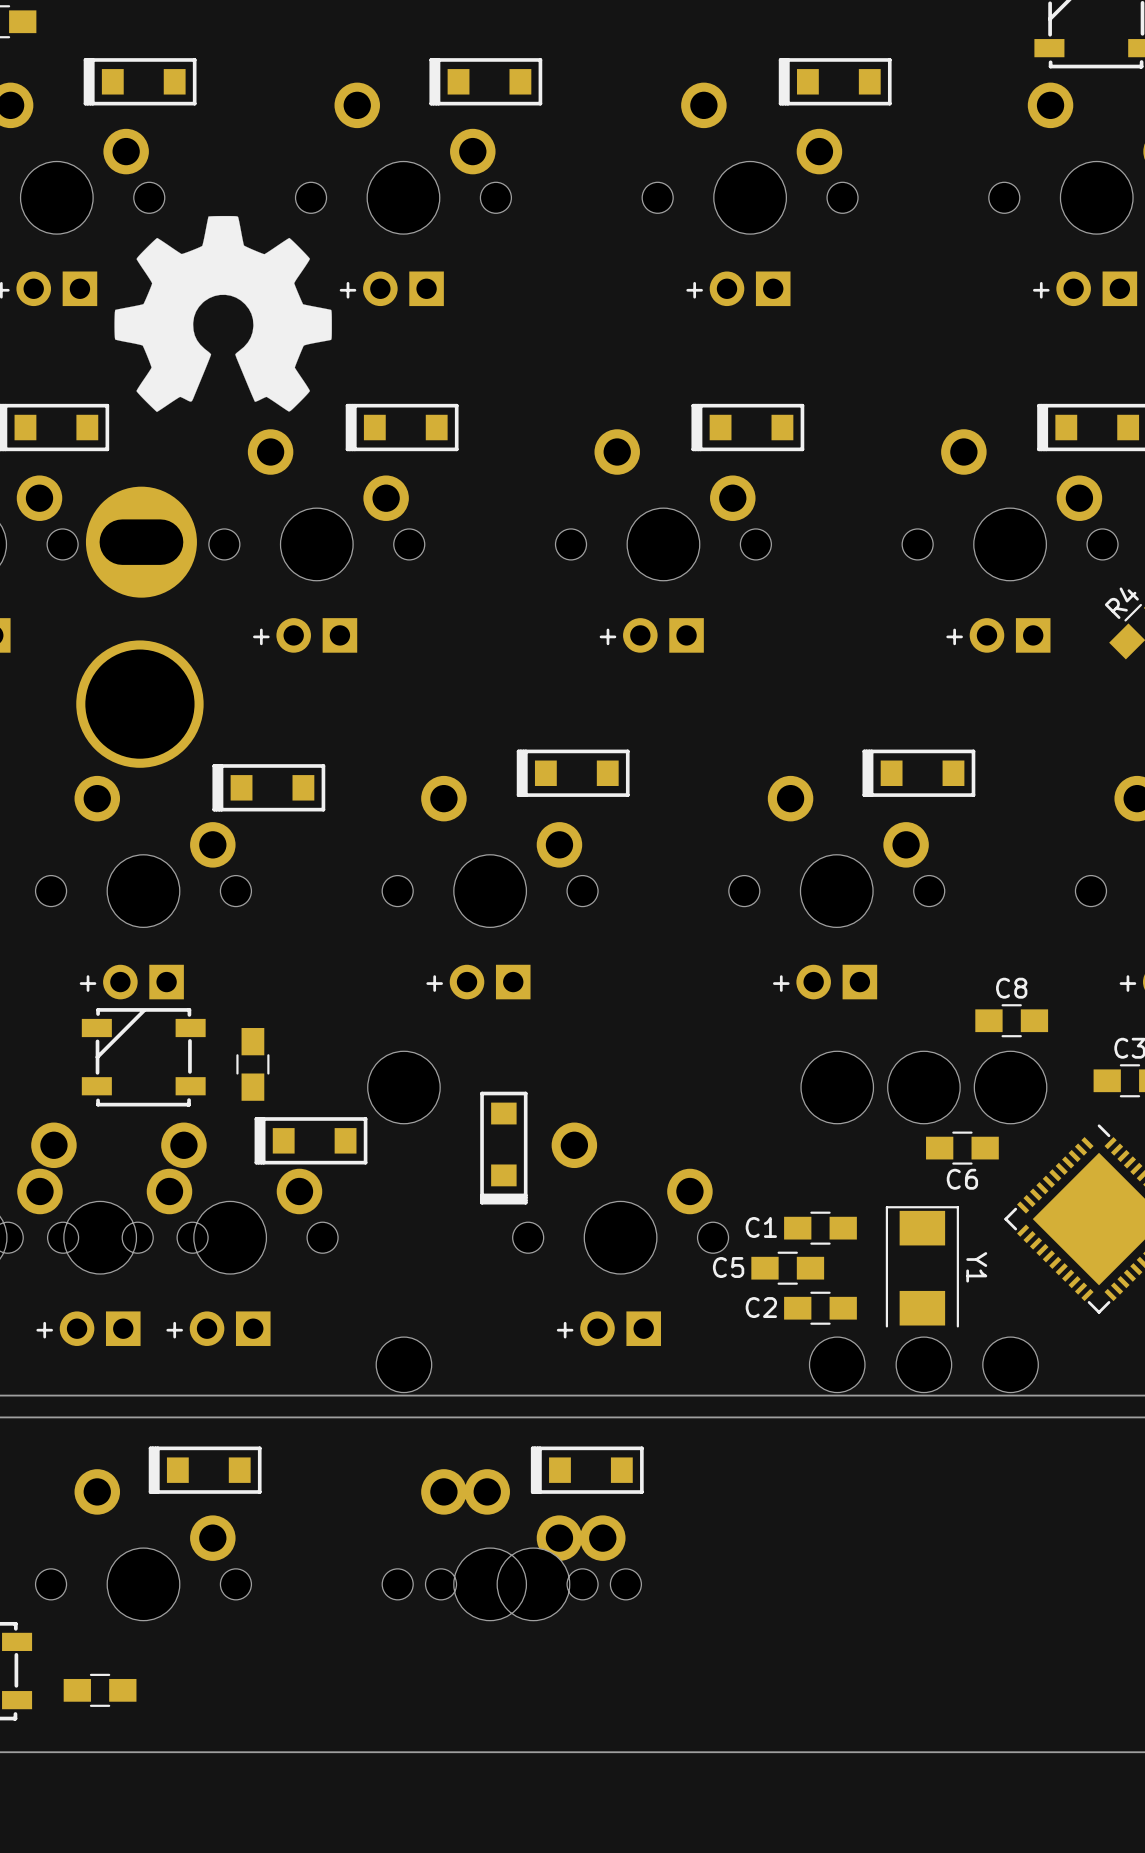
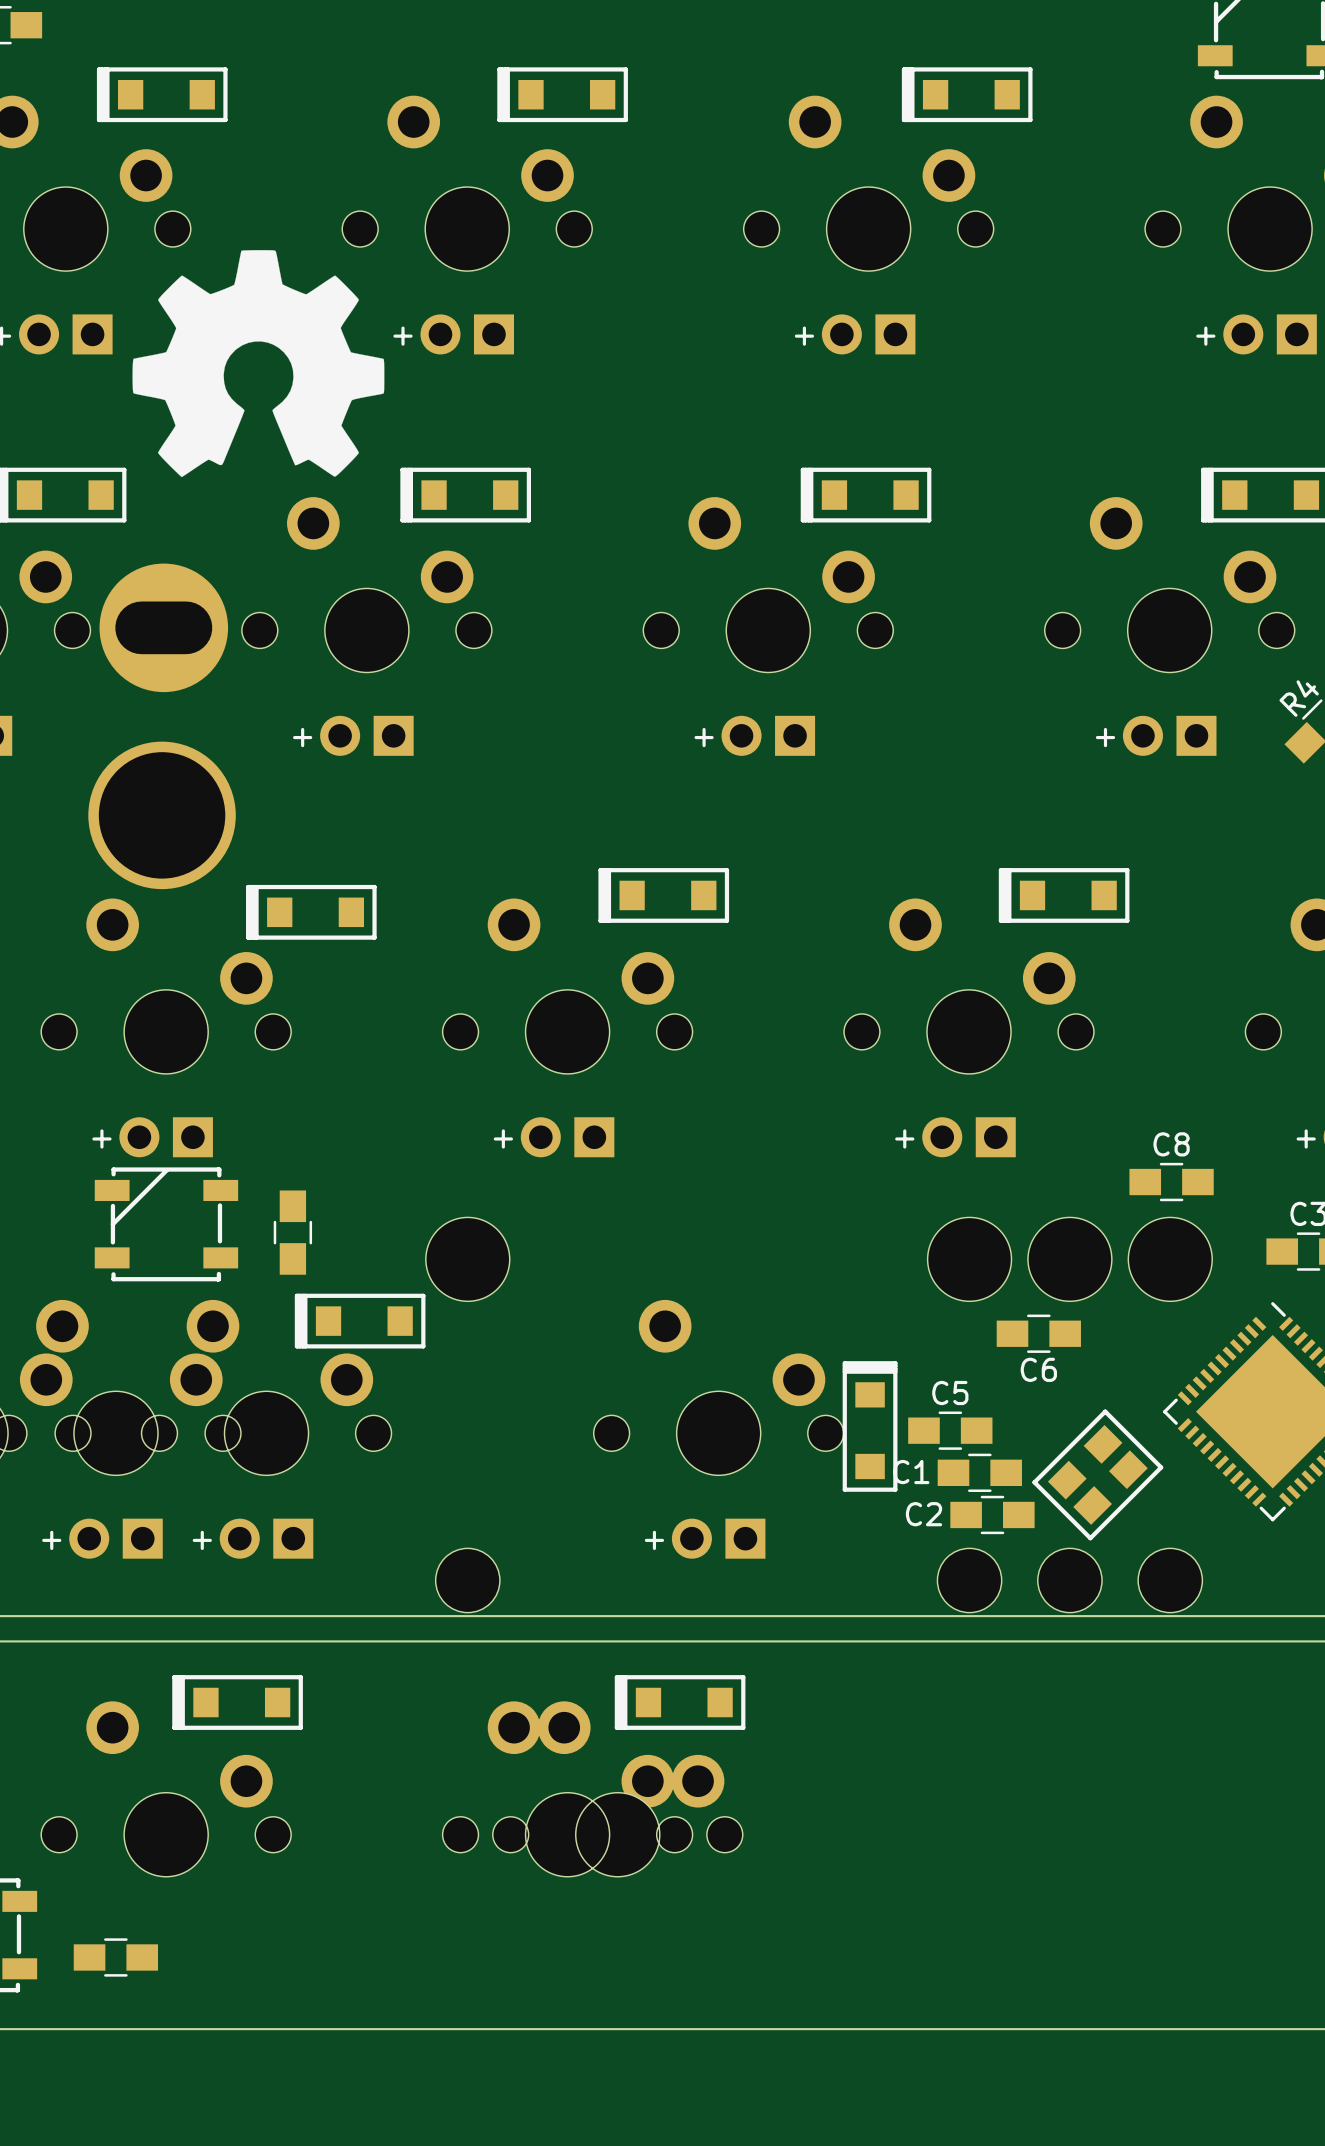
part rotation: 0° (503, 1148) -> 180° (870, 1426)
part position: (503, 1148) -> (870, 1426)
C6 position: (962, 1148) -> (1038, 1333)
C1 position: (820, 1228) -> (979, 1472)
Y1: (922, 1266) -> none
C5 name position: C5 (728, 1267) -> C5 (950, 1393)
C5 position: (787, 1268) -> (950, 1430)
part: none -> (1097, 1474)
C2 position: (820, 1308) -> (992, 1514)

